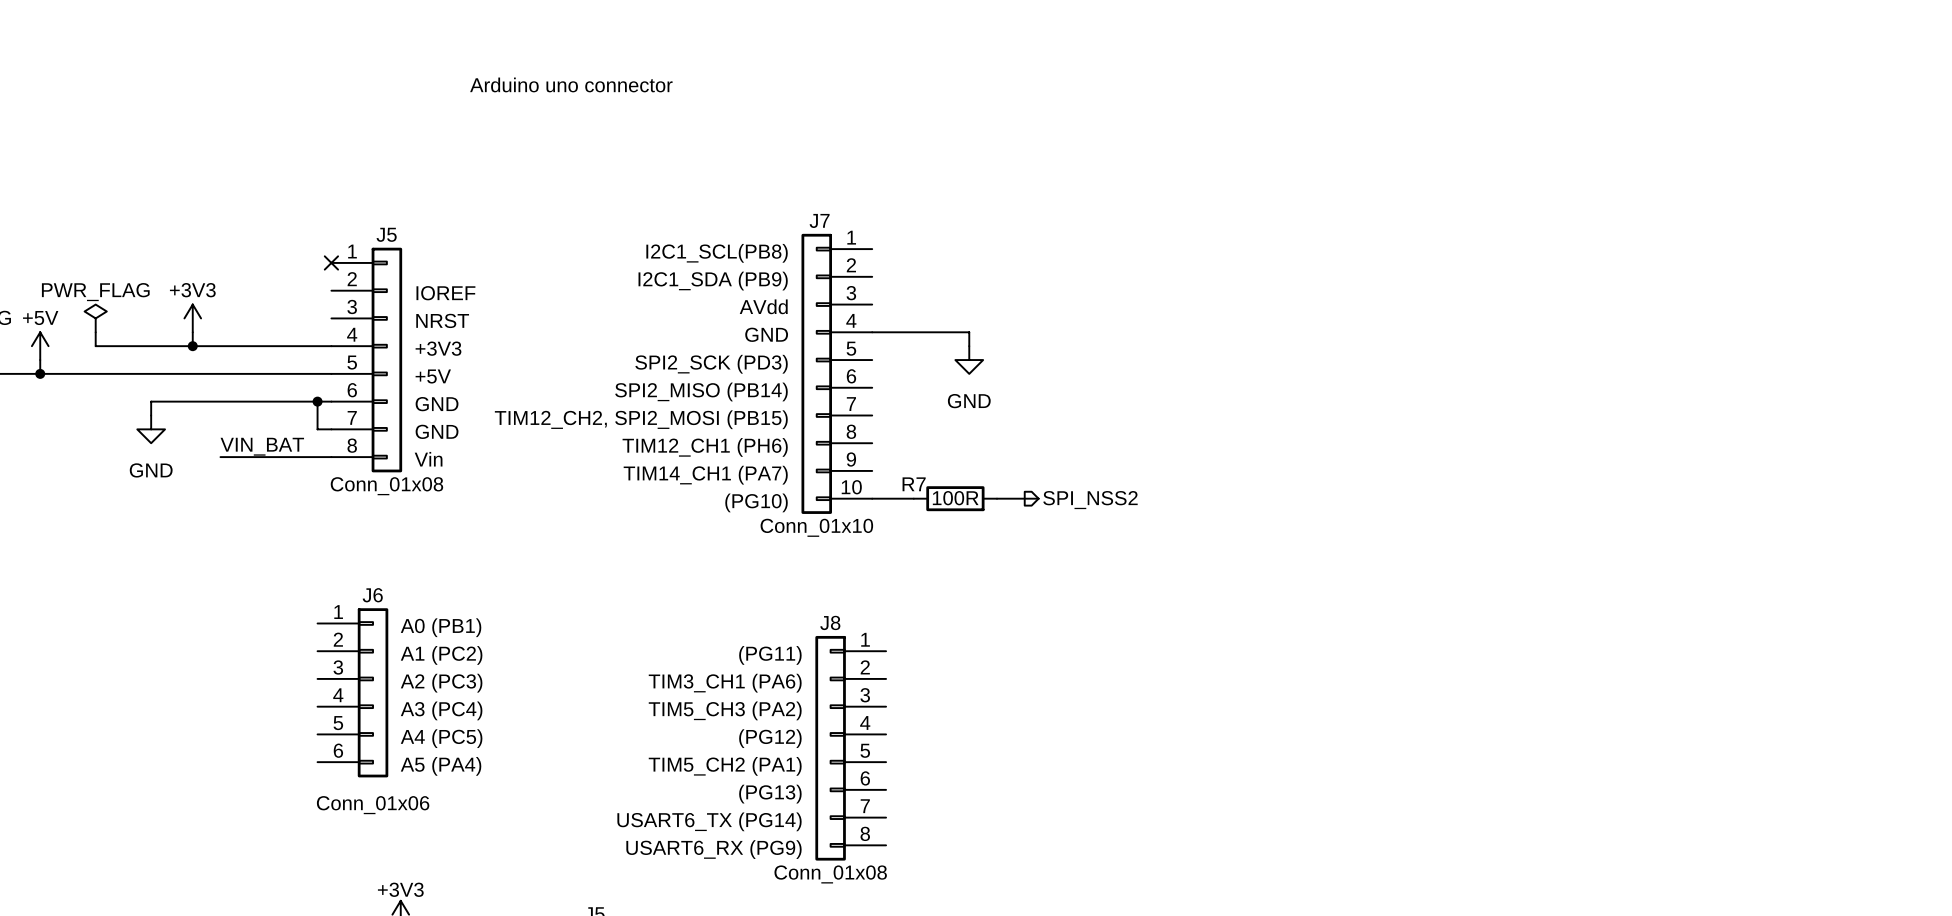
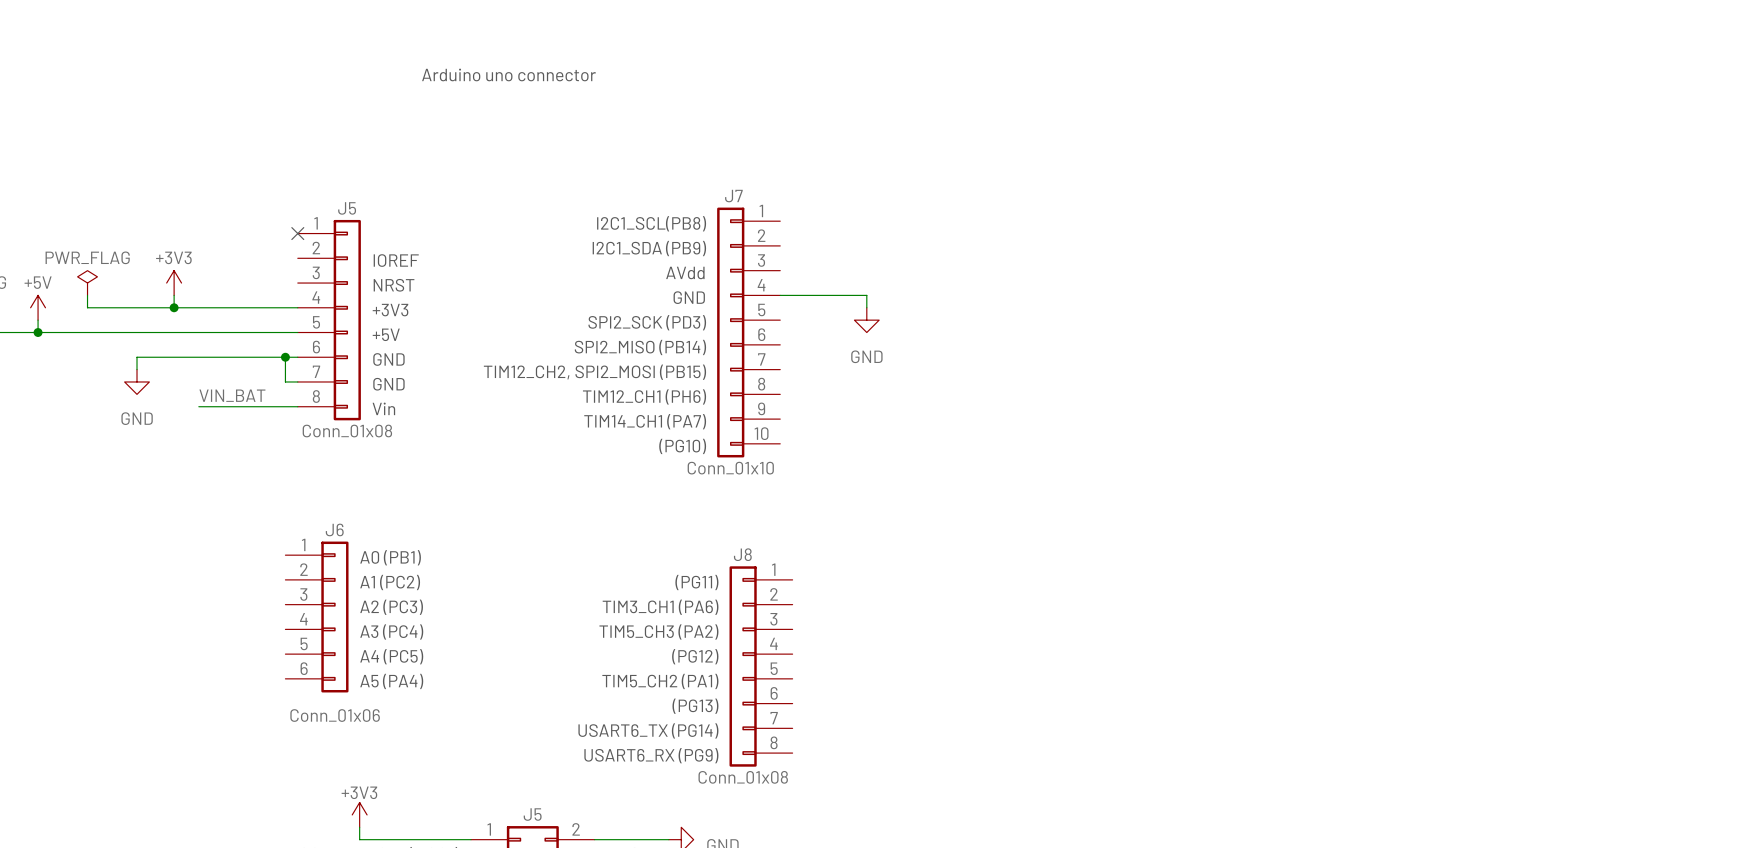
wire: (872, 498) (913, 498) -> none
R7: 100R (955, 498) -> none
wire: (997, 498) (1038, 498) -> none
hierarchical label: SPI_NSS2 (1090, 500) -> none

